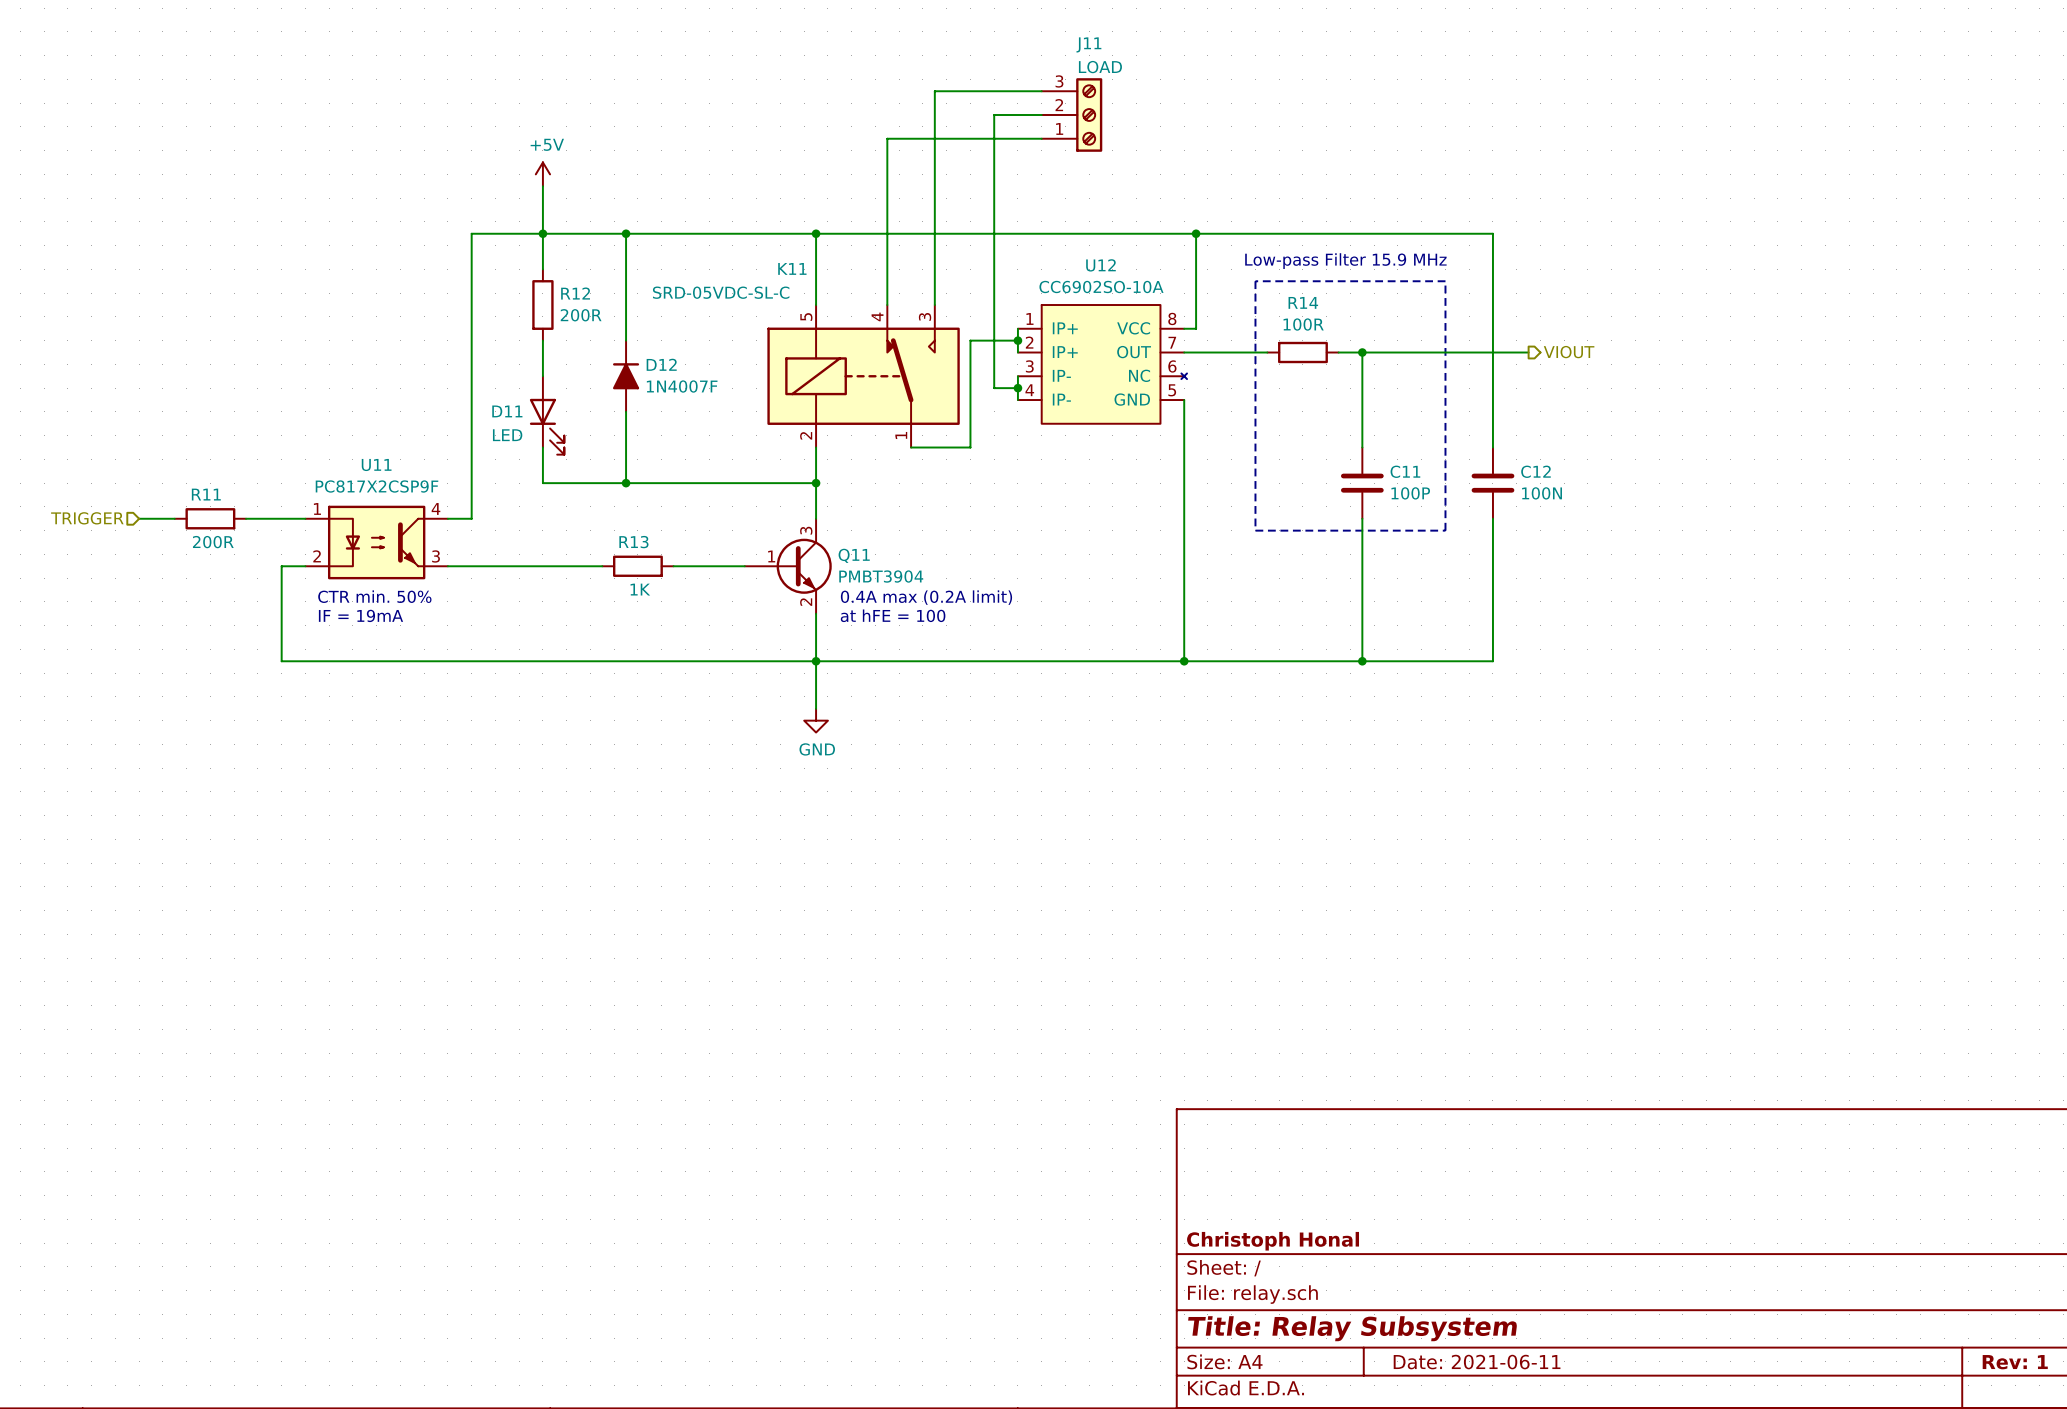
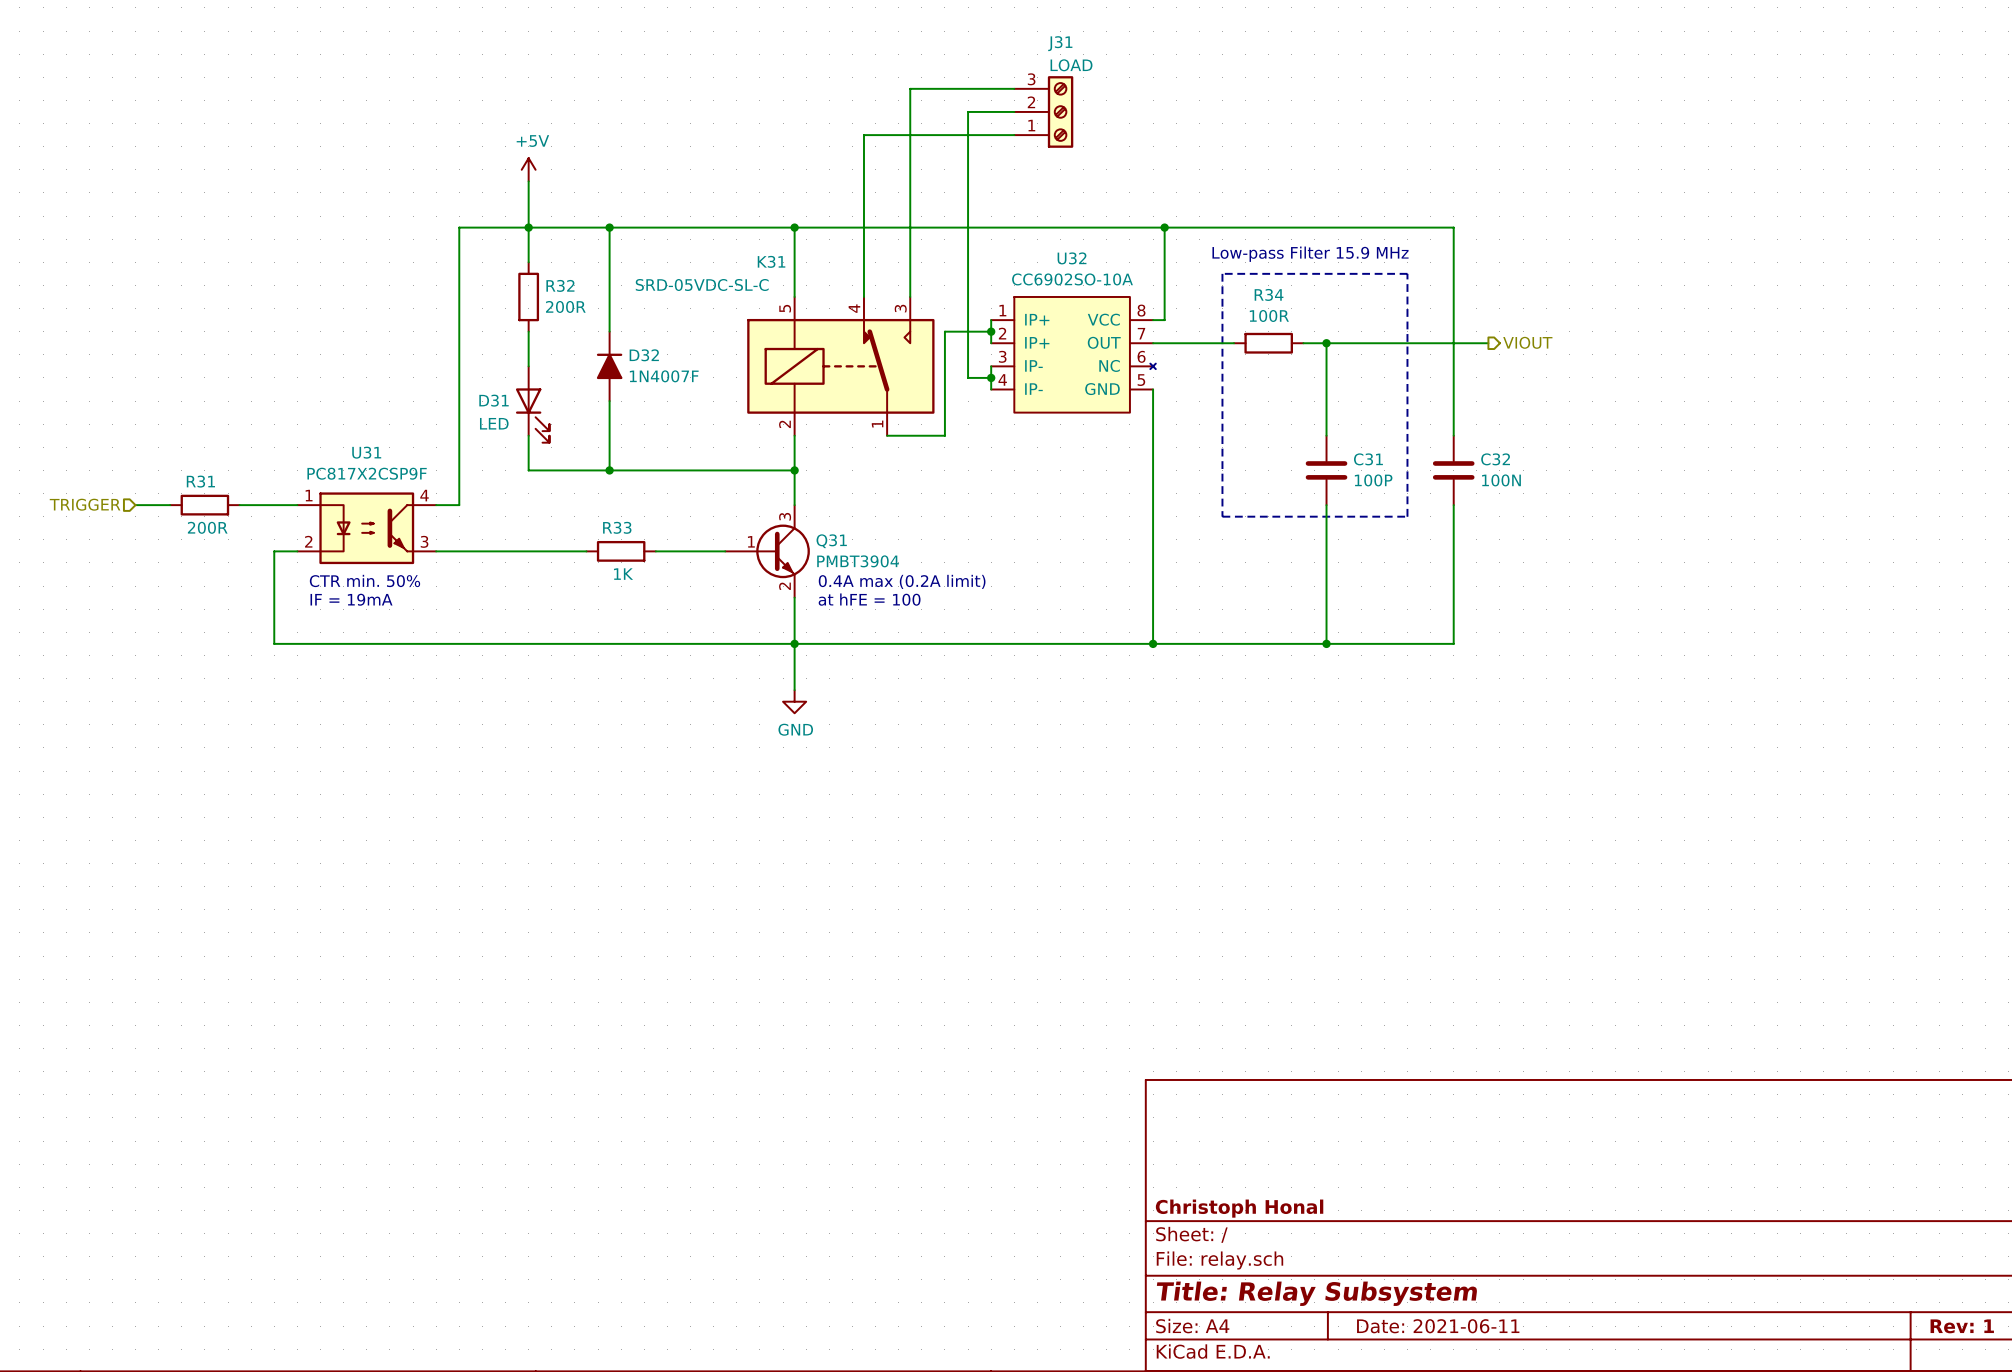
J11 name: J11 (1088, 44) -> J31 (1060, 43)
U12 name: U12 (1100, 265) -> U32 (1072, 258)
K11 name: K11 (792, 268) -> K31 (771, 261)
R12 name: R12 (575, 293) -> R32 (560, 285)
R14 name: R14 (1303, 302) -> R34 (1269, 294)
D12 name: D12 (661, 364) -> D32 (644, 355)
D11 name: D11 (507, 411) -> D31 (494, 400)
U11 name: U11 (376, 465) -> U31 (366, 452)
C11 name: C11 (1405, 471) -> C31 (1368, 459)
C12 name: C12 (1535, 471) -> C32 (1495, 459)
R11 name: R11 (206, 494) -> R31 (200, 481)
R13 name: R13 (633, 542) -> R33 (617, 527)
Q11 name: Q11 (854, 555) -> Q31 (831, 541)

